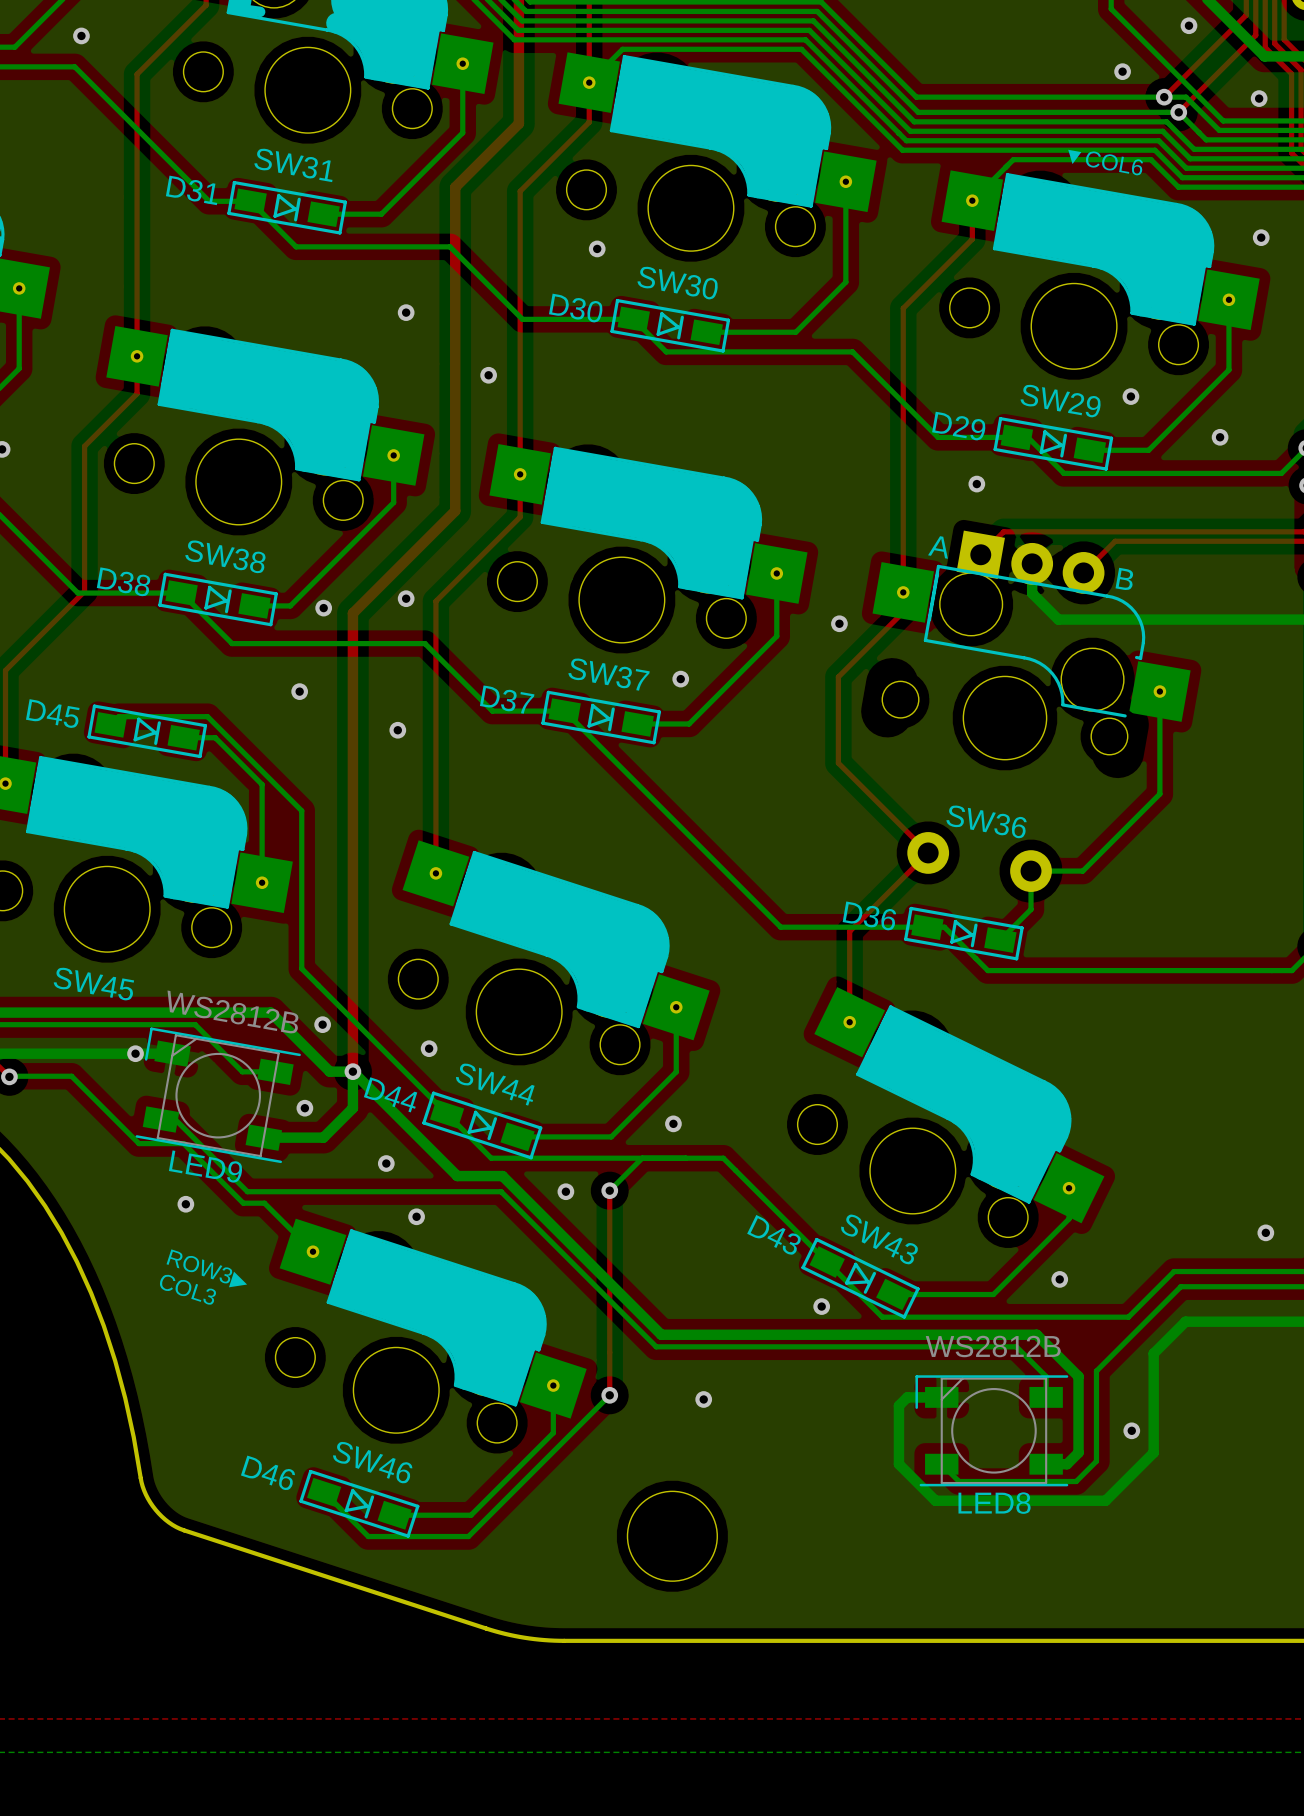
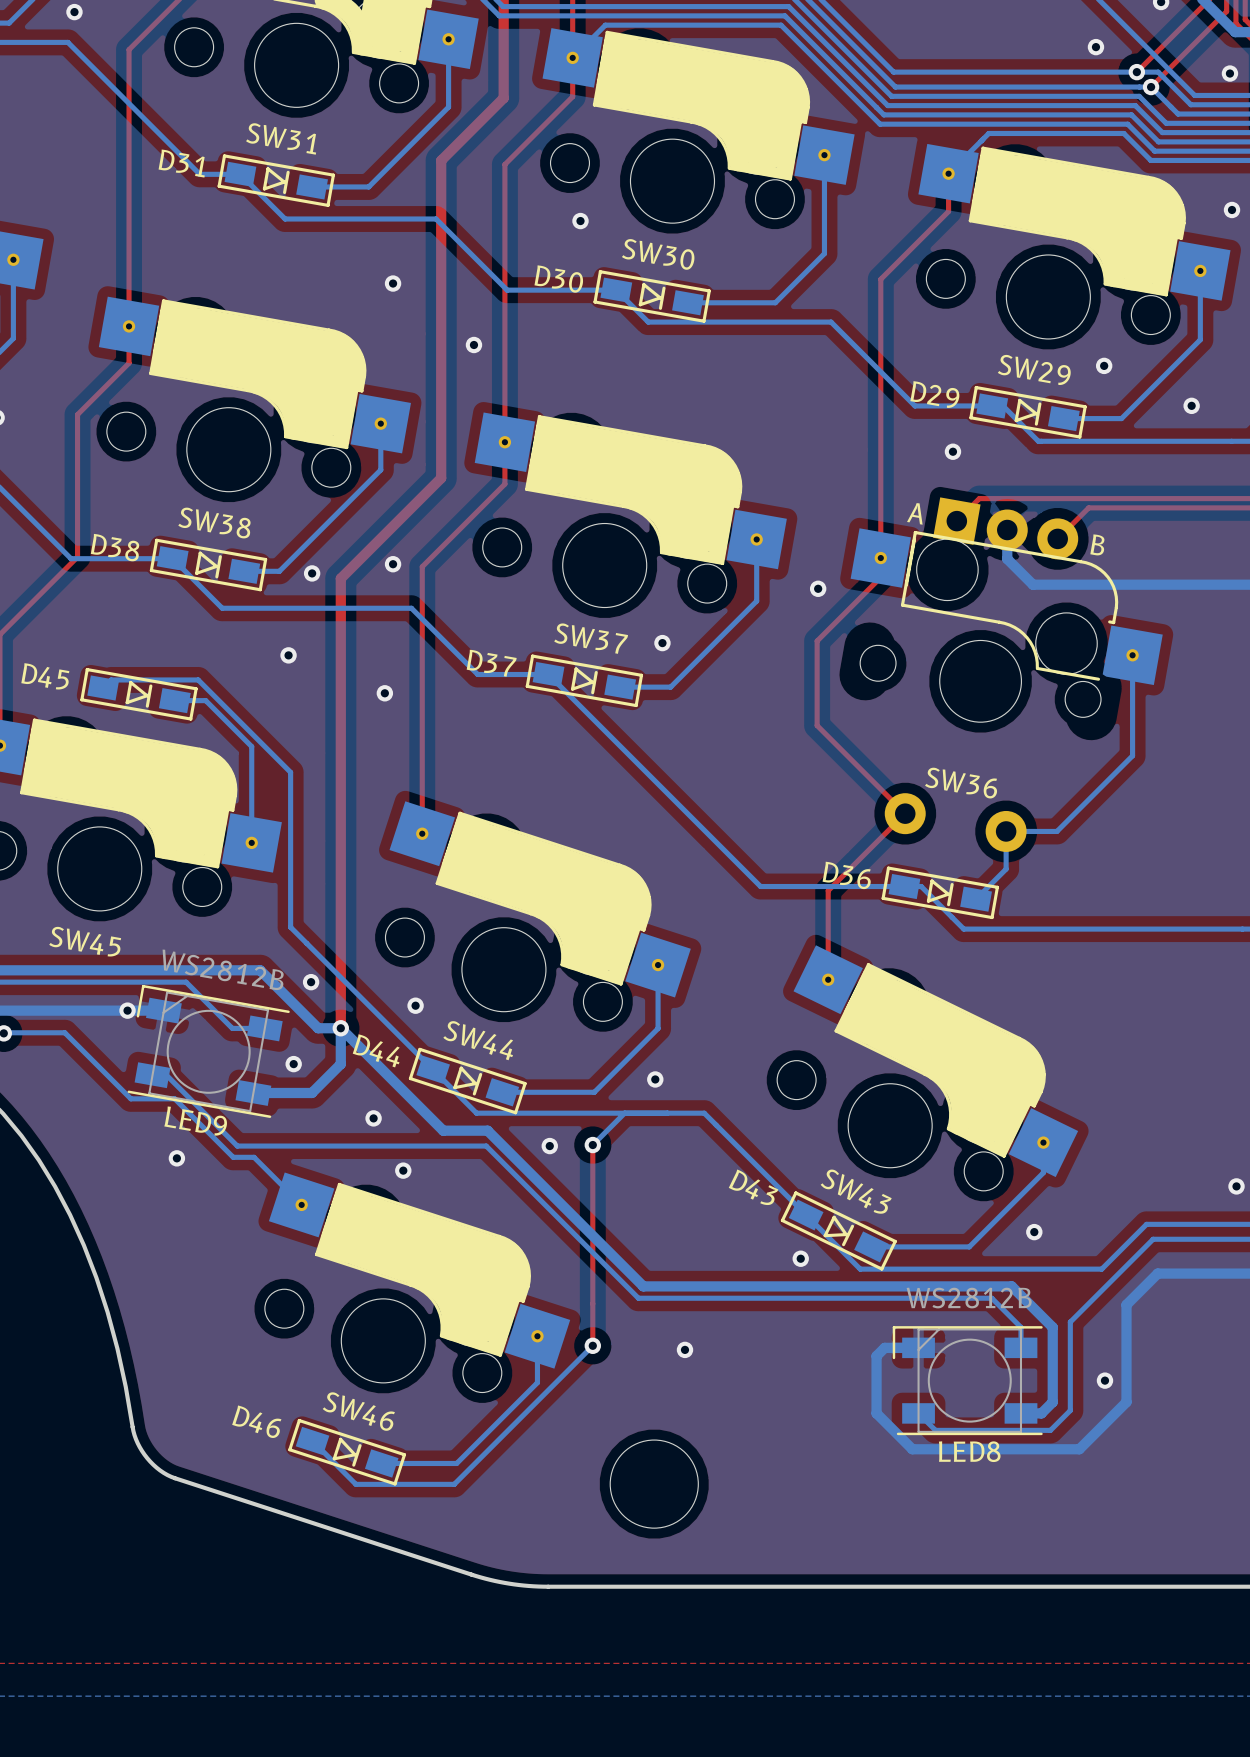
text: ▼COL6 (1105, 162) -> none
text: ROW3▶ (206, 1268) -> none
text: COL3 (188, 1289) -> none

